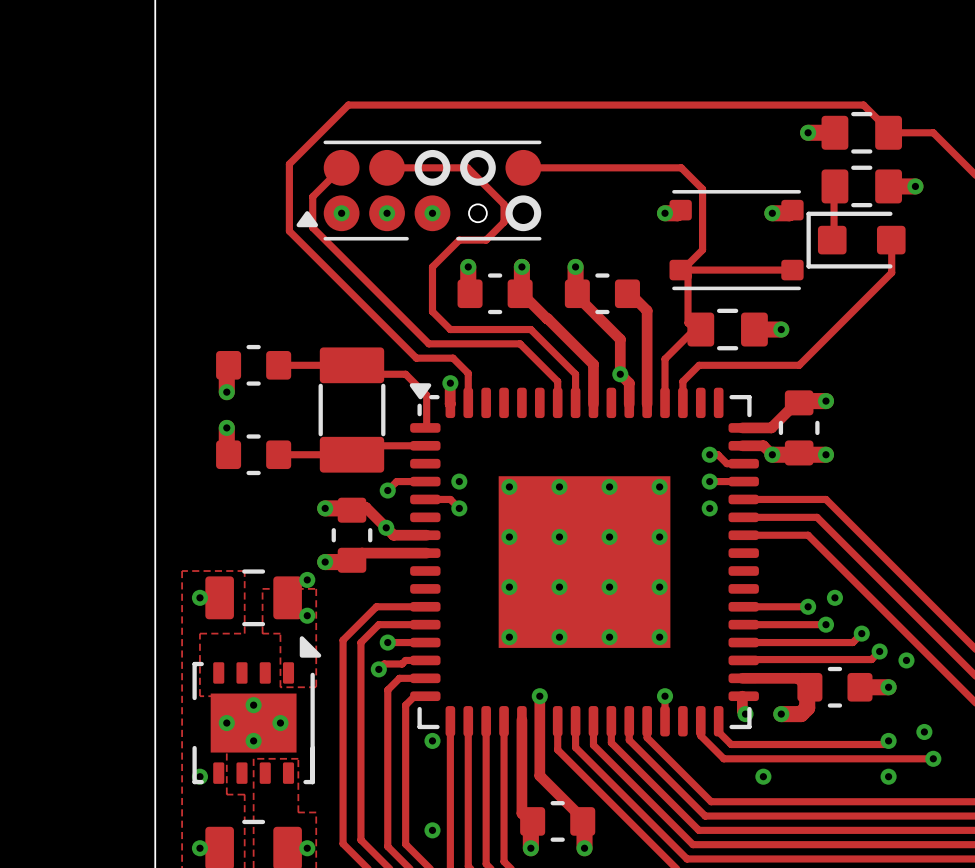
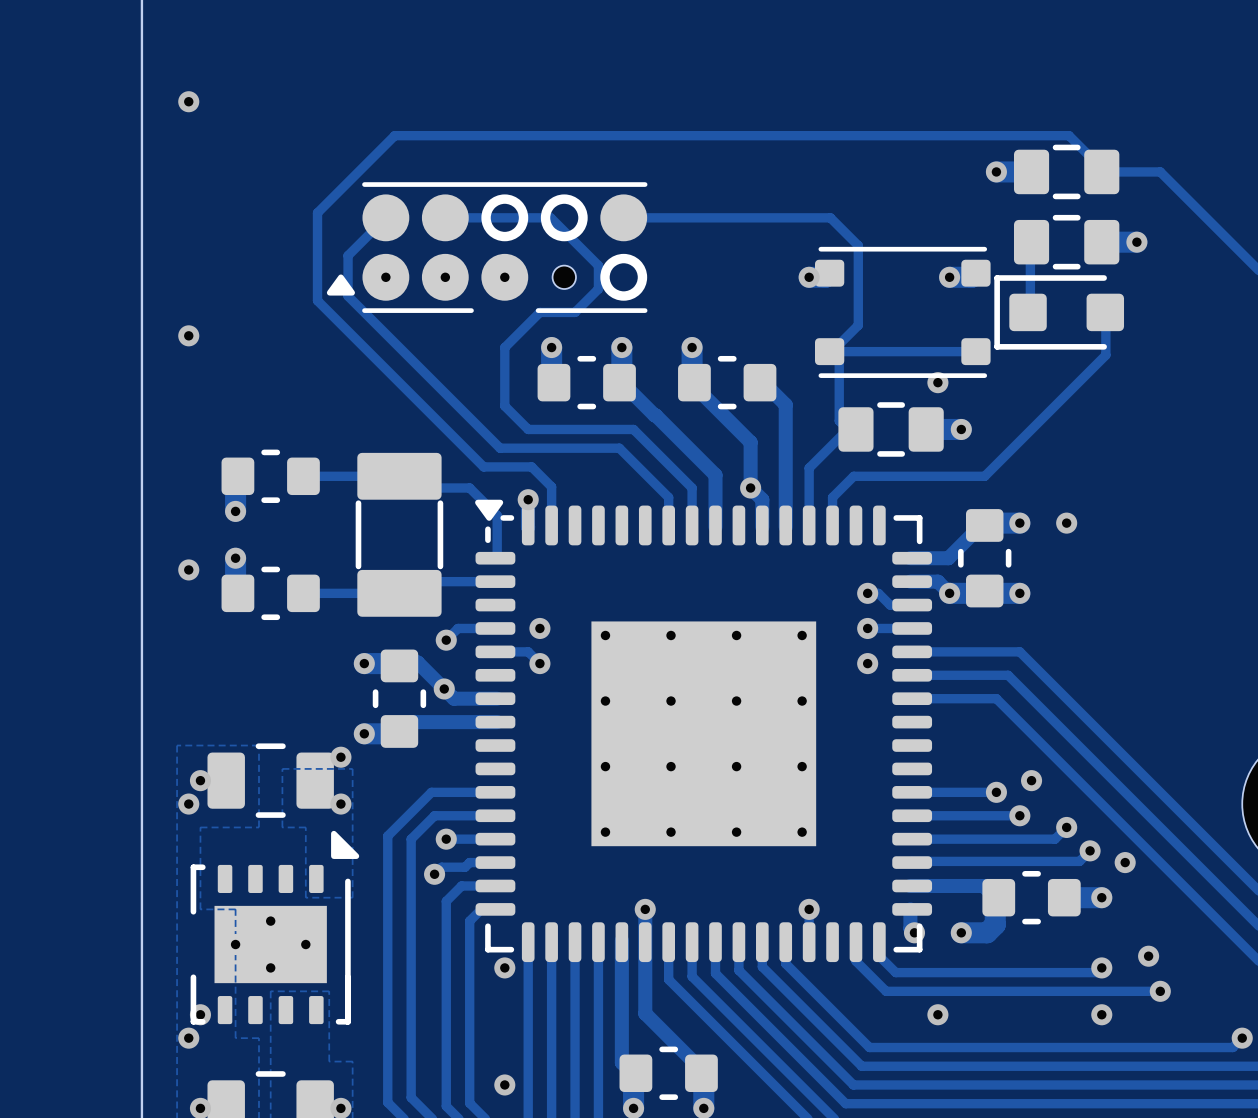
via: none -> (188, 101)
via: none -> (188, 335)
via: none -> (937, 382)
via: none -> (1066, 523)
via: none -> (188, 569)
via: none -> (188, 804)
via: none -> (188, 1038)

